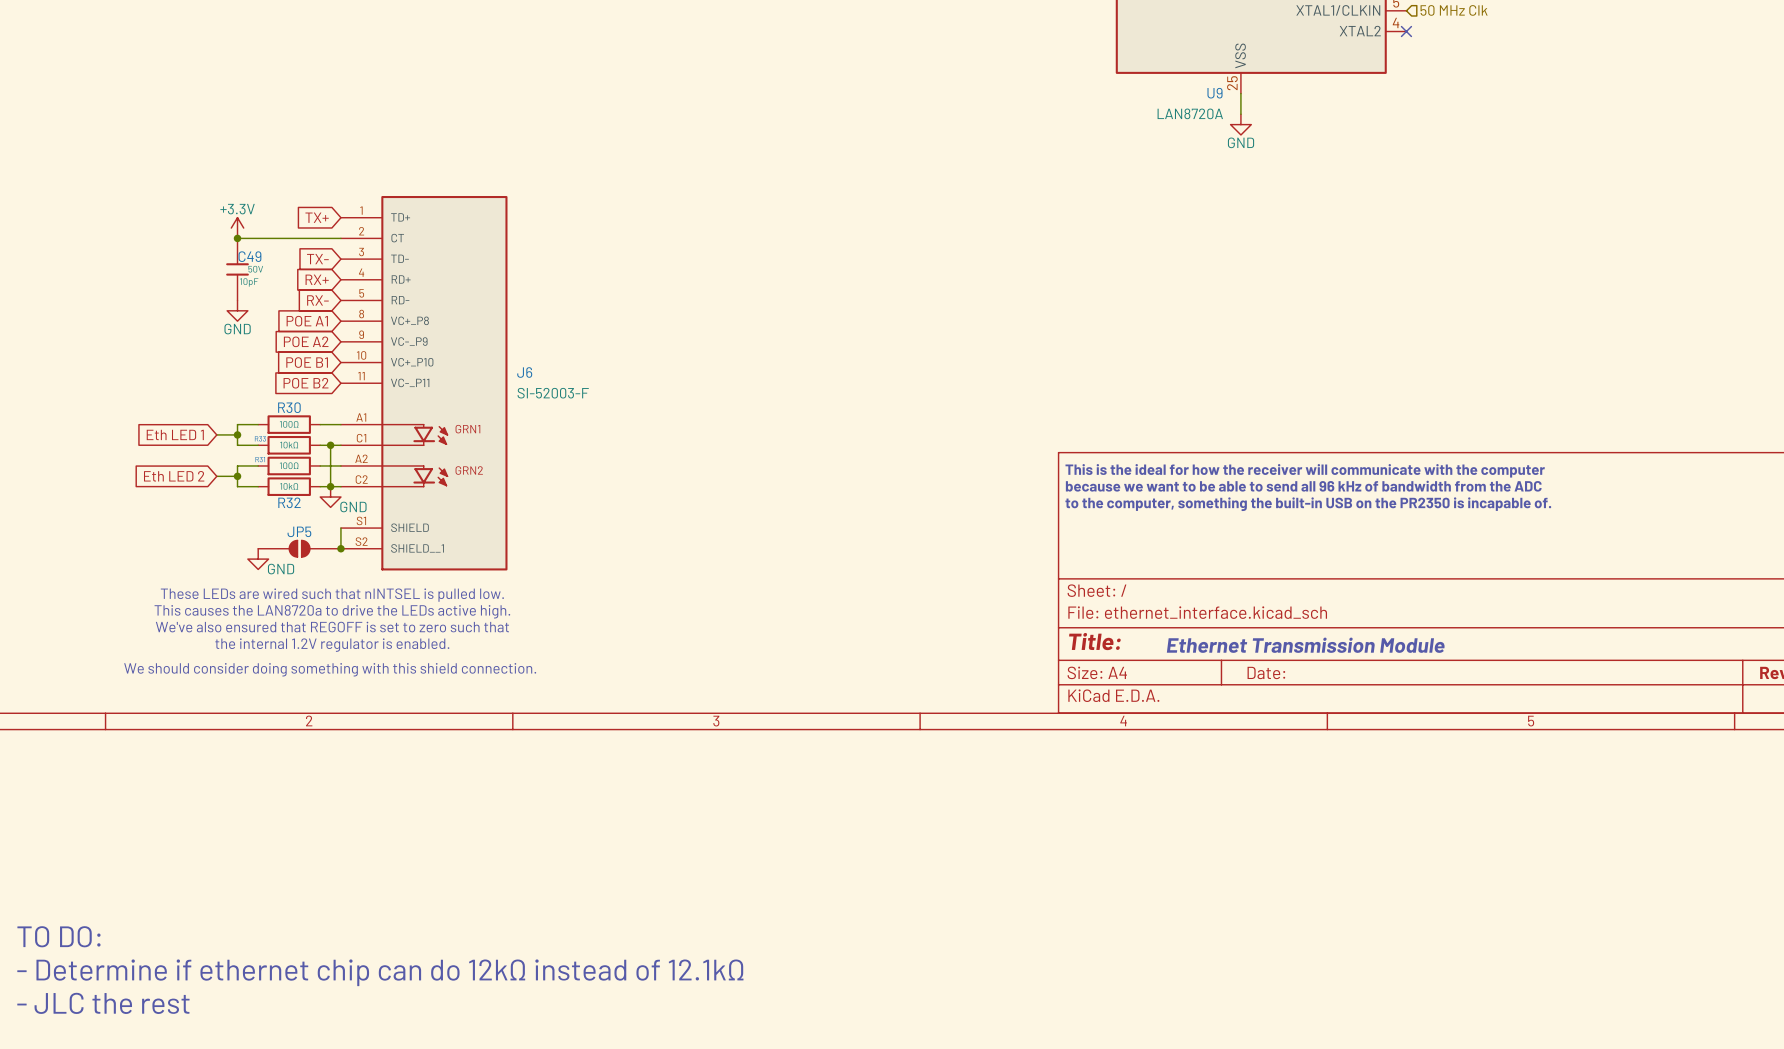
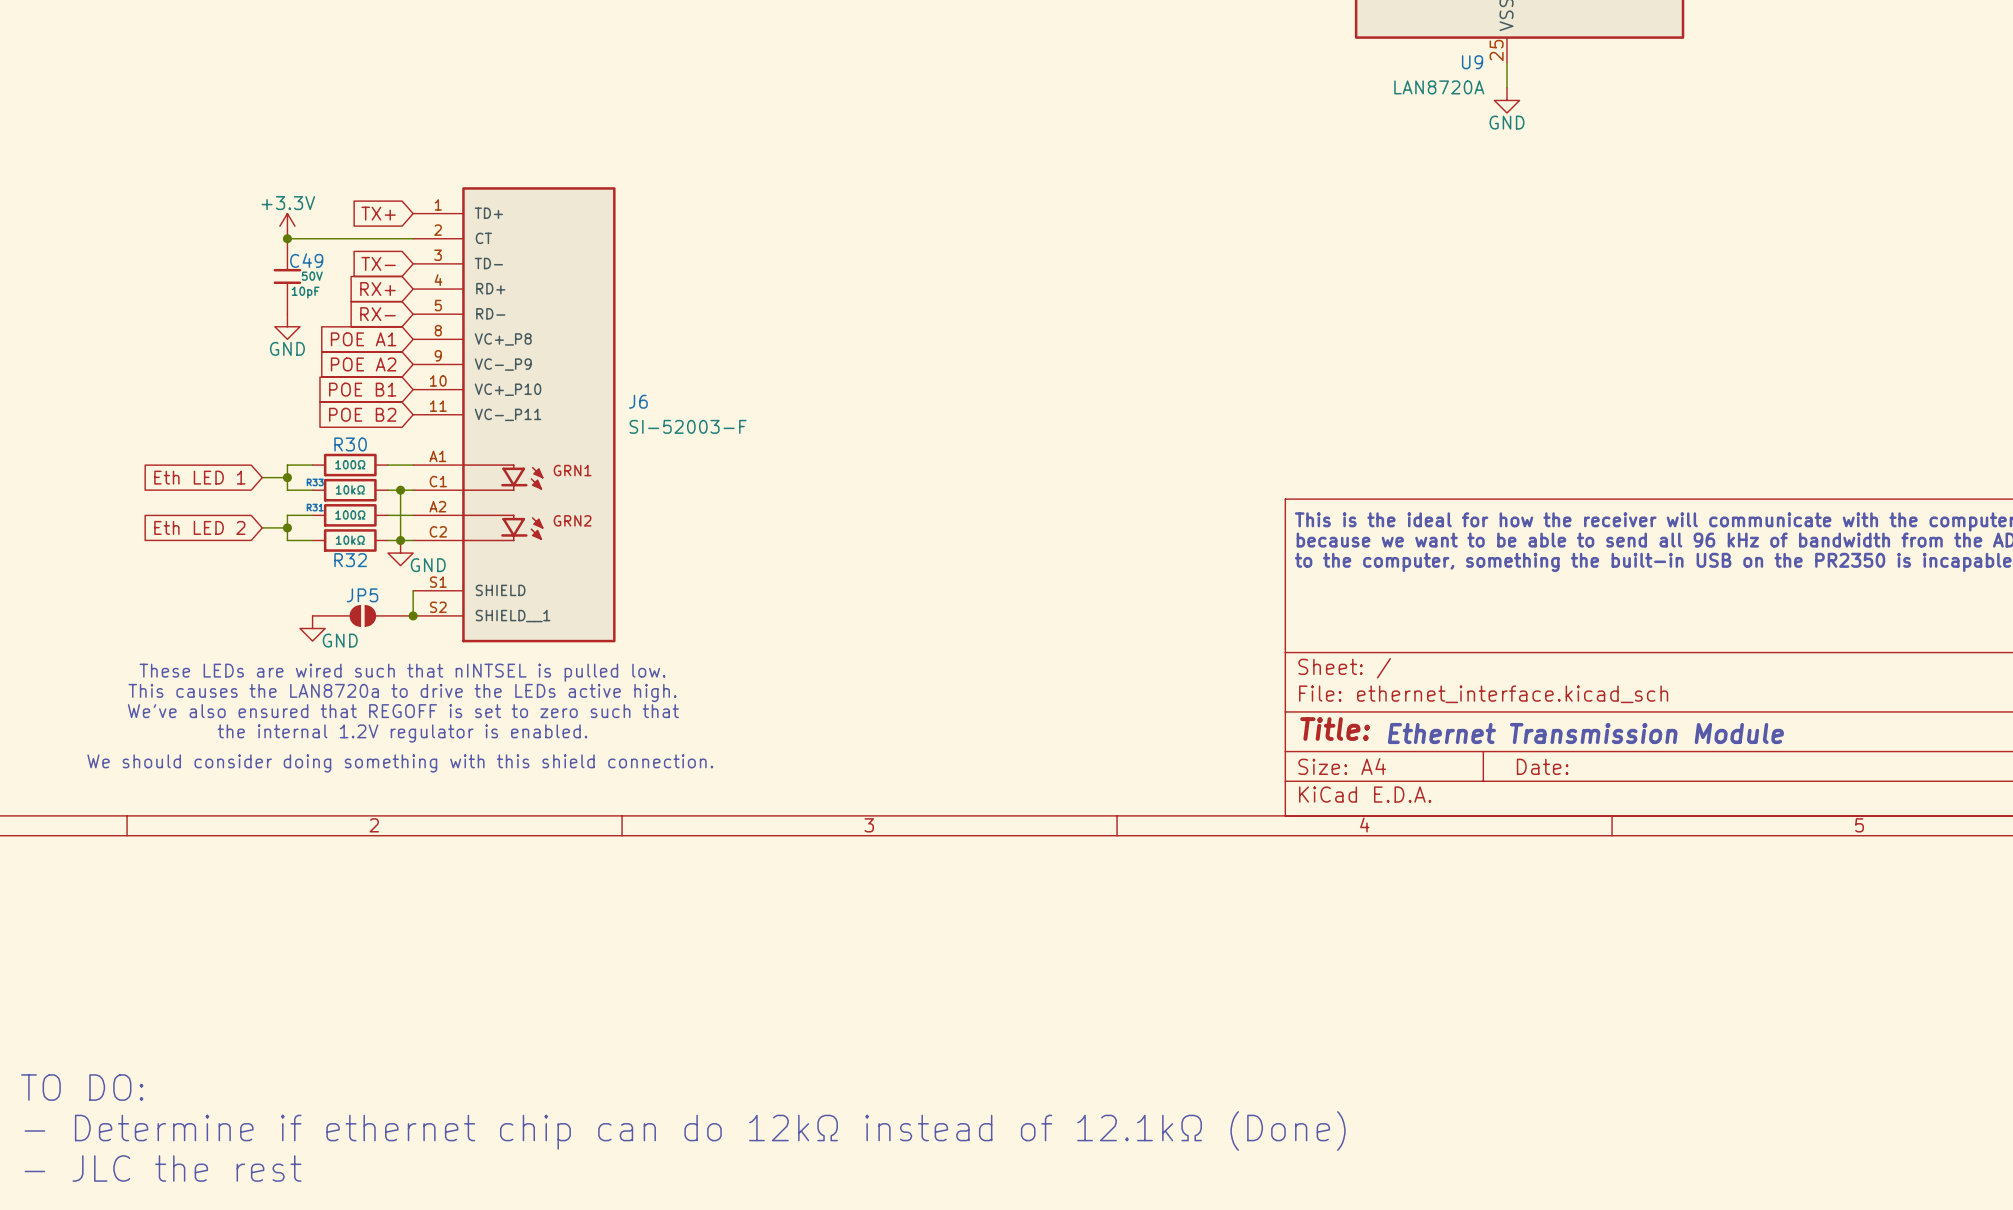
text: - Determine if ethernet chip can do 12kΩ instead of 12.1kΩ (380, 972) -> - Determine if ethernet chip can do 12kΩ instead of 12.1kΩ (Done) (685, 1130)

